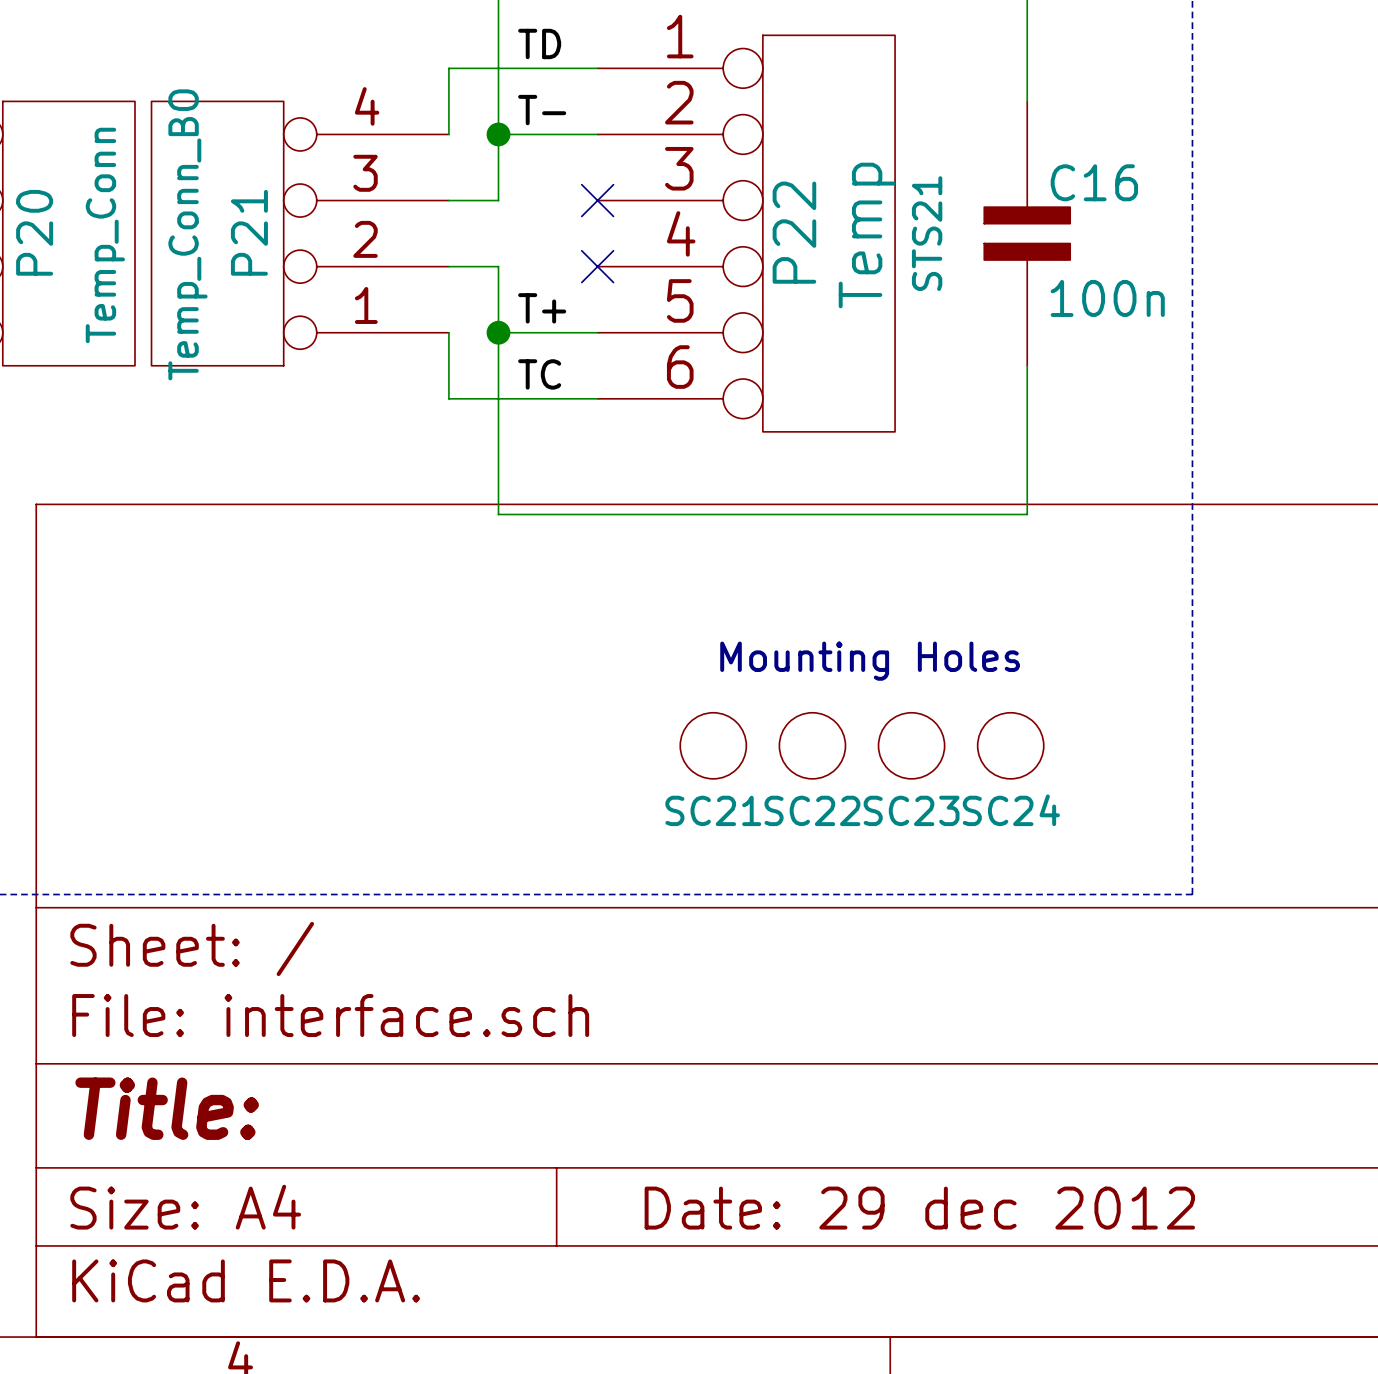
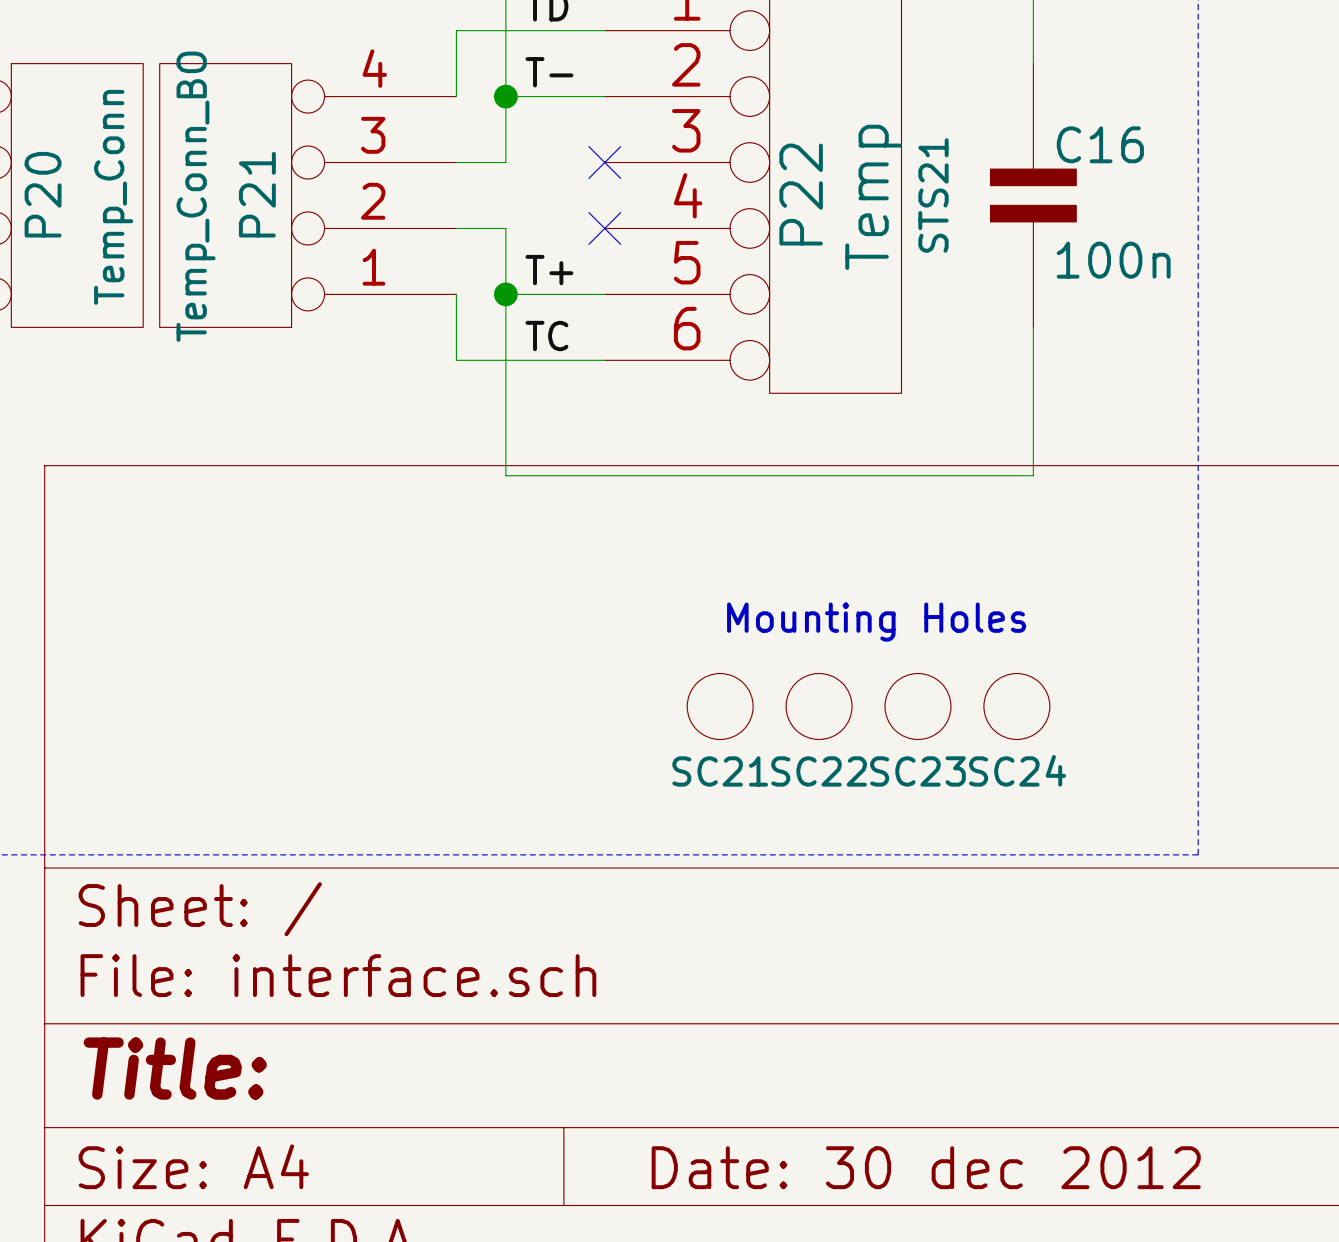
title block: Date: 29 dec 2012 (919, 1208) -> Date: 30 dec 2012 (926, 1167)

